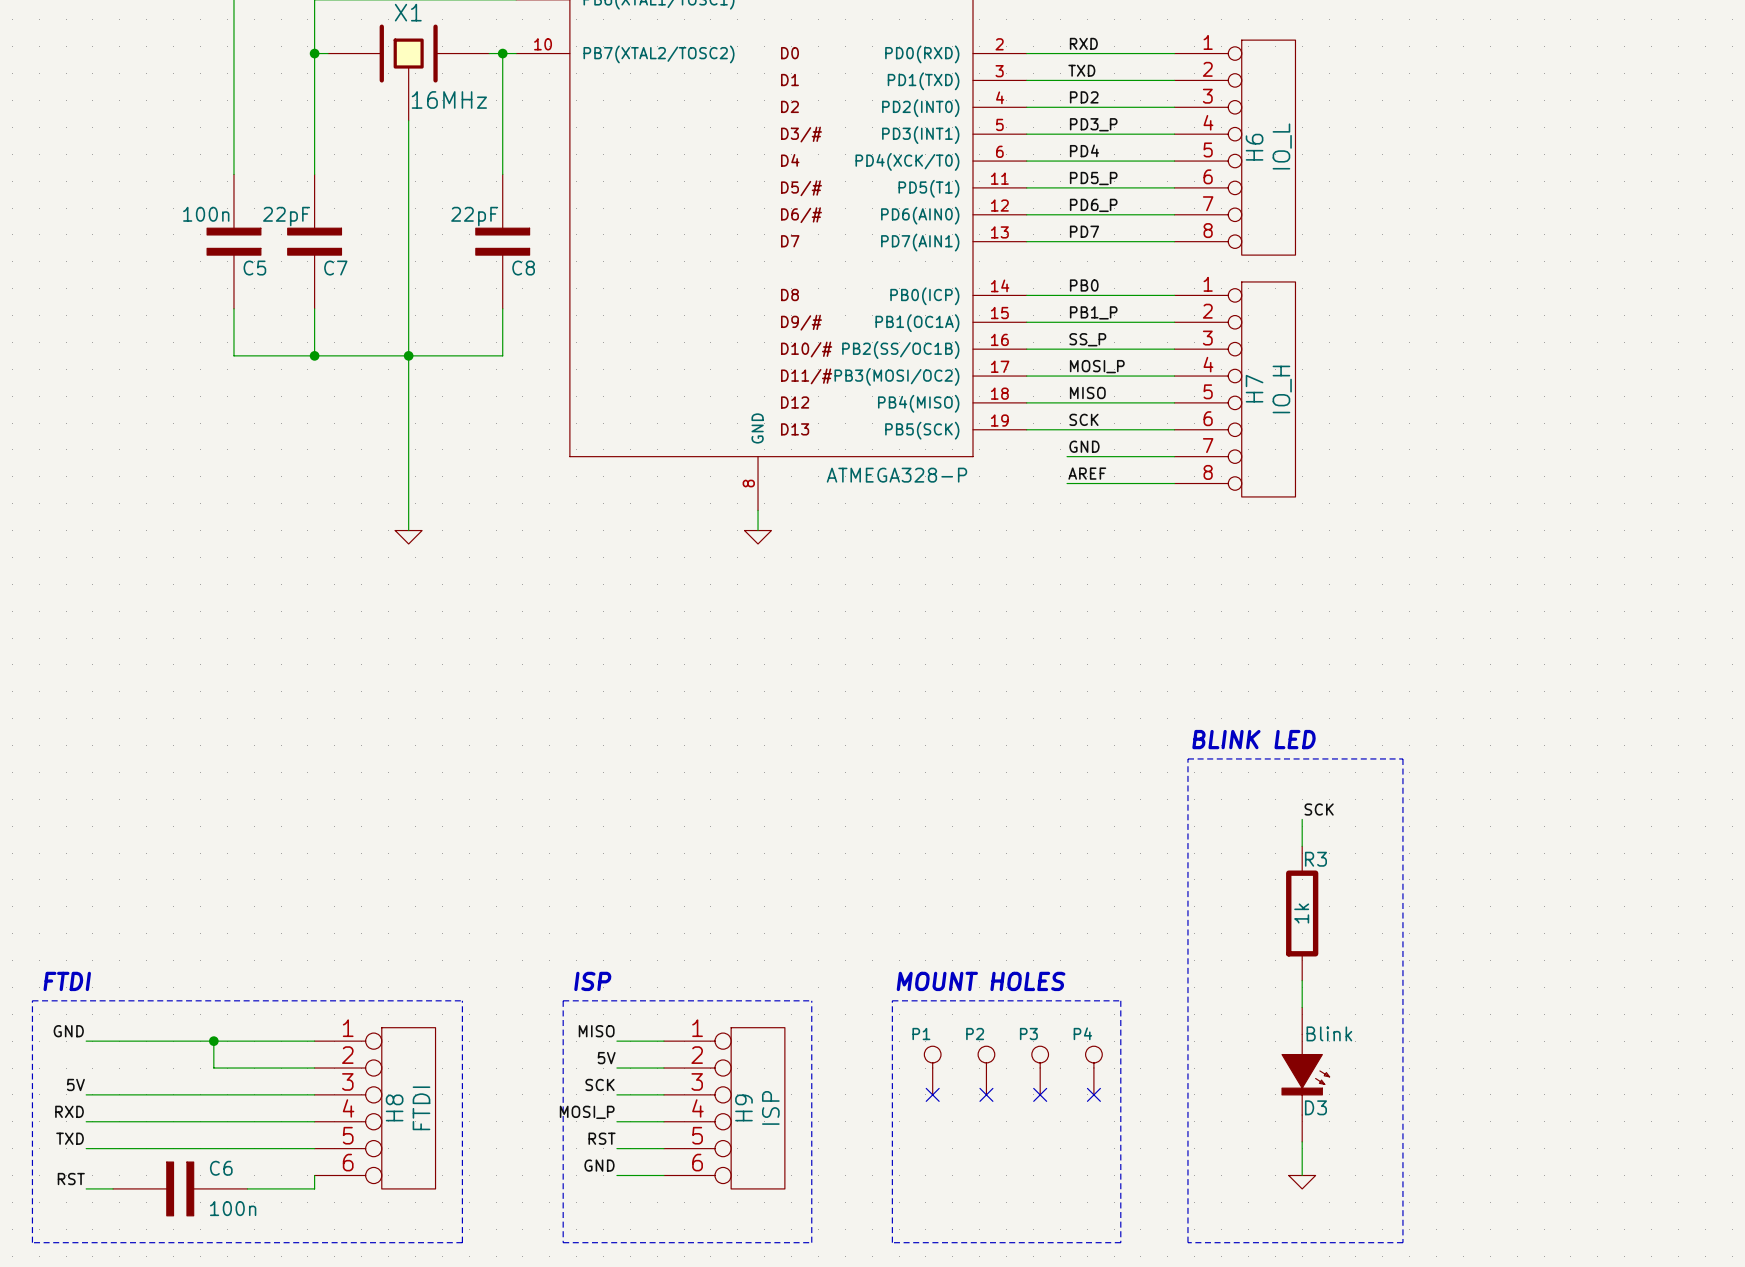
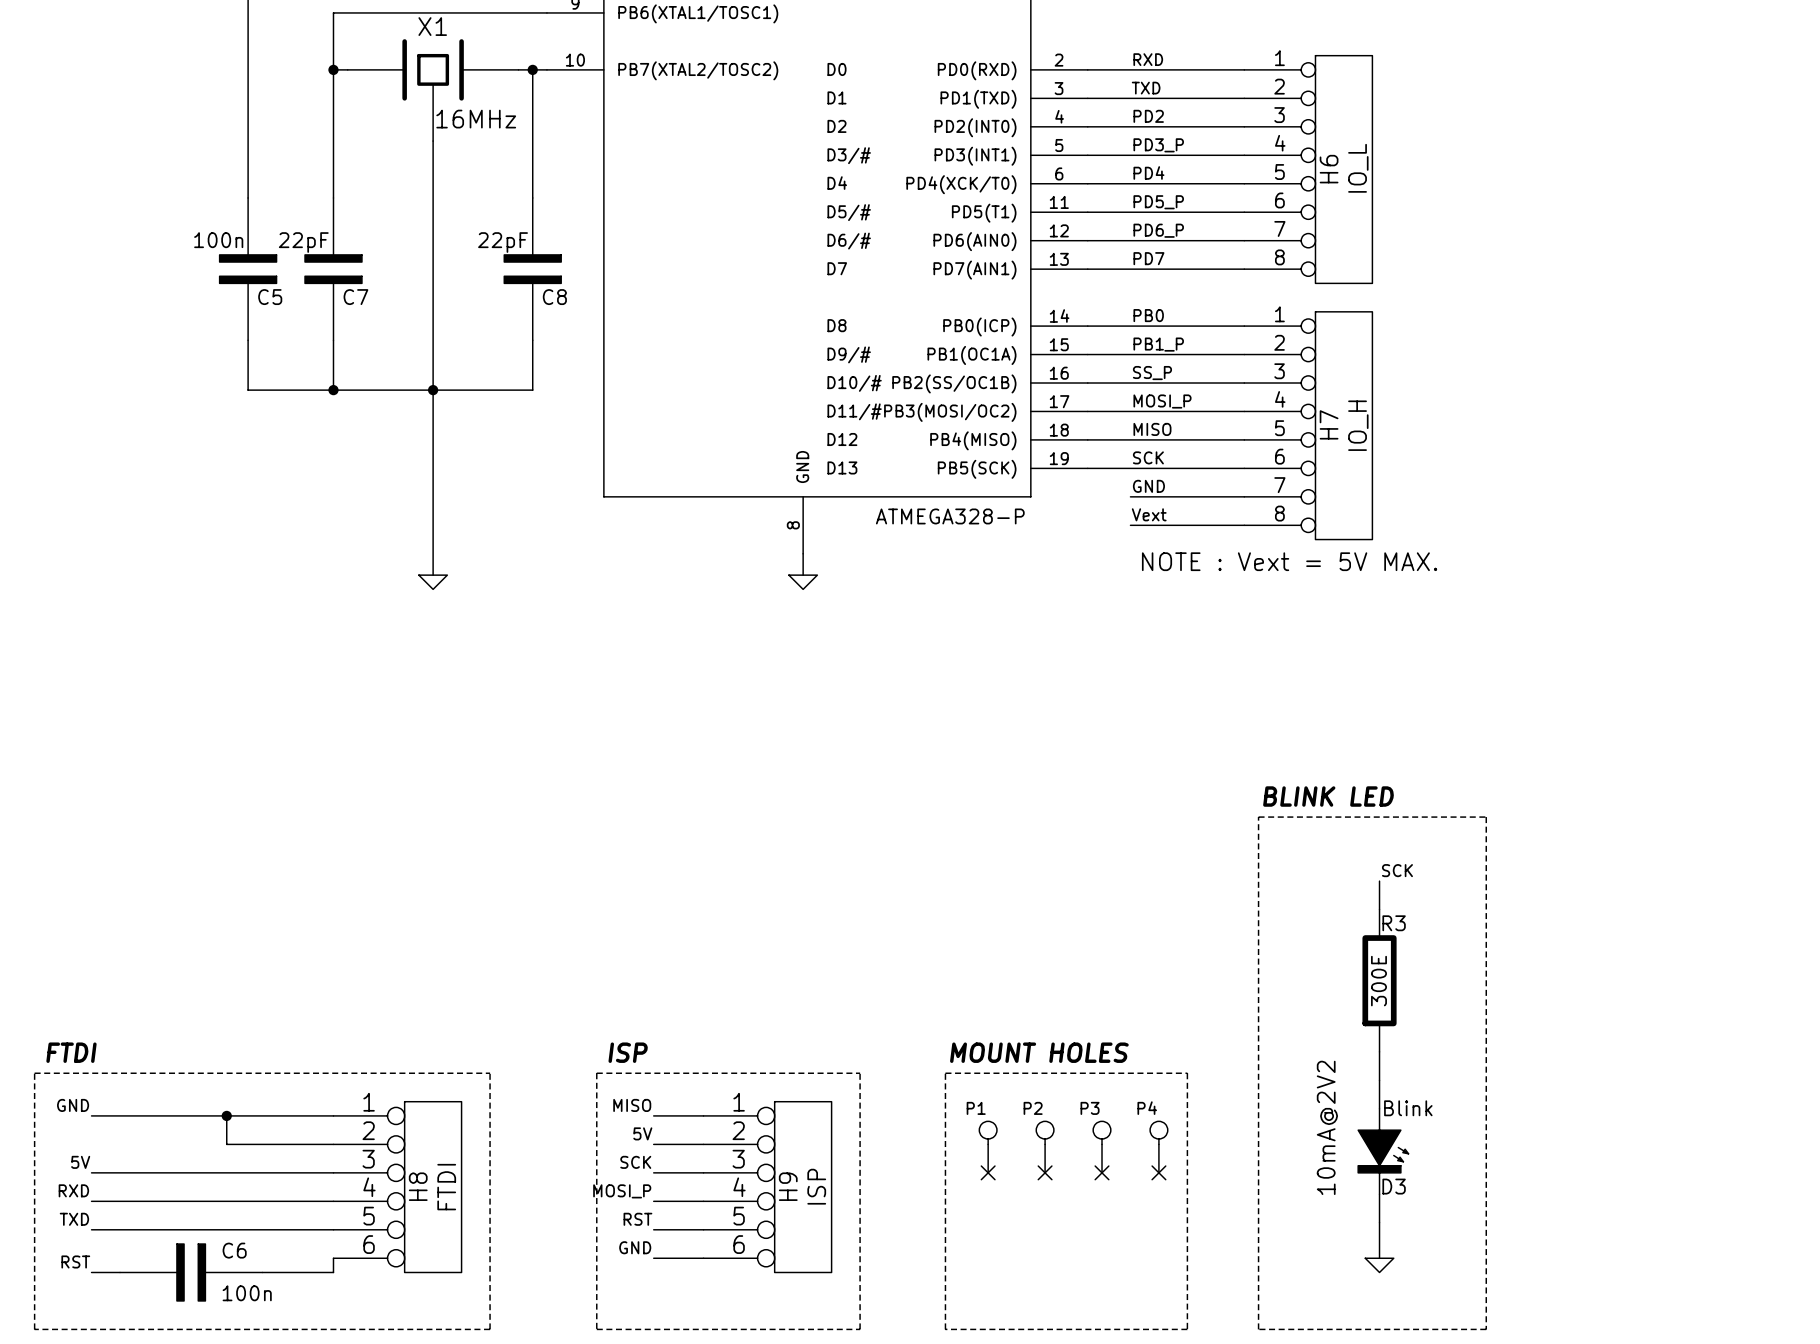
label: AREF (1087, 473) -> Vext (1149, 514)
text: none -> NOTE : Vext = 5V MAX. (1289, 561)
R3 value: 1k (1301, 913) -> 300E (1378, 981)
text: none -> 10mA@2V2 (1327, 1127)

